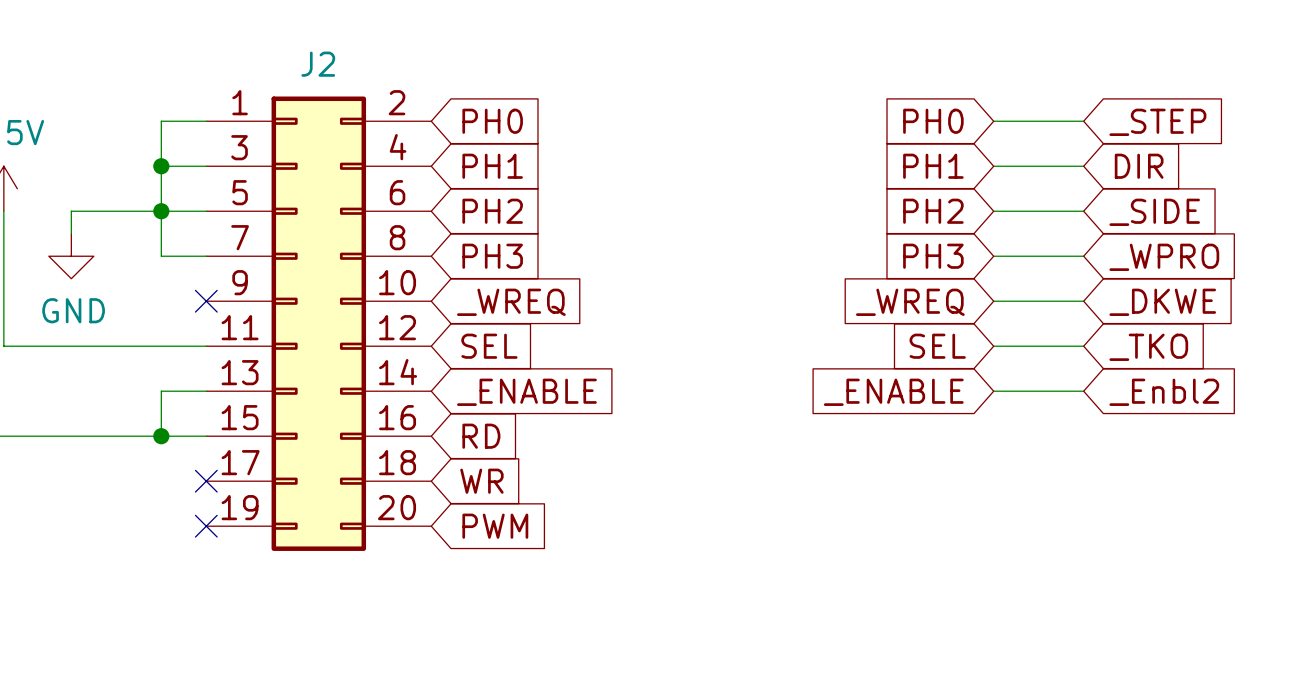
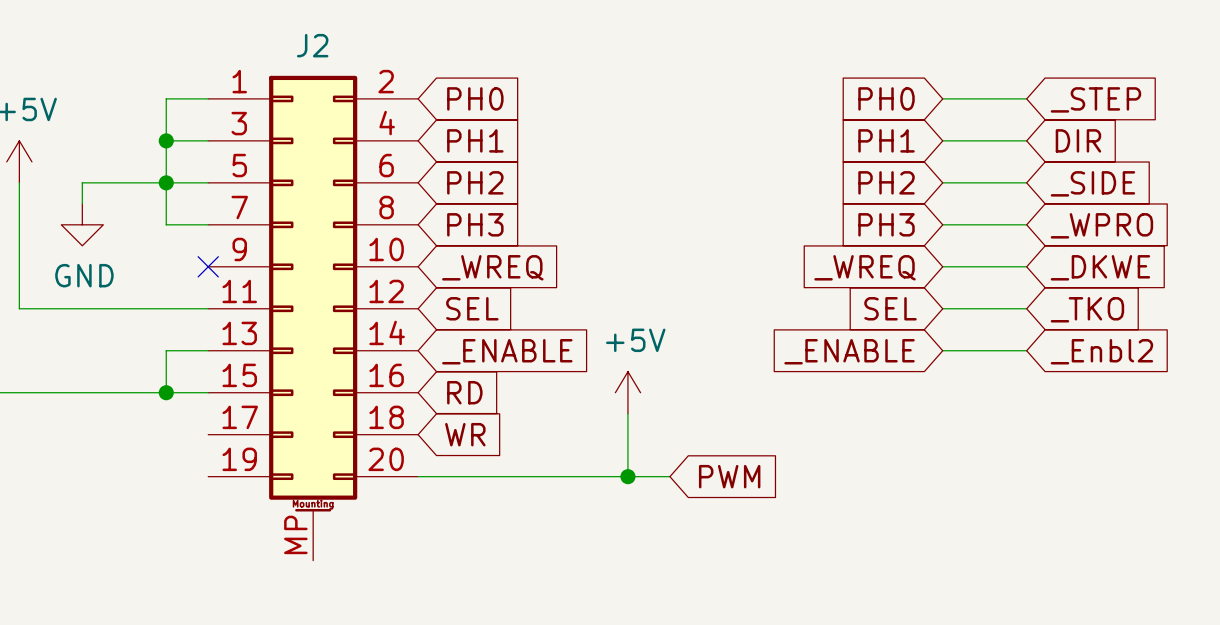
J2 symbol: [206, 96, 432, 551] -> [208, 75, 419, 561]
power symbol: none -> +5V (627, 392)
wire: none -> (627, 413) (627, 476)
no-connect mark: (206, 481) -> none
no-connect mark: (206, 526) -> none
wire: none -> (418, 476) (669, 476)
global label position: PWM (495, 526) -> PWM (729, 476)
junction: none -> (627, 476)

